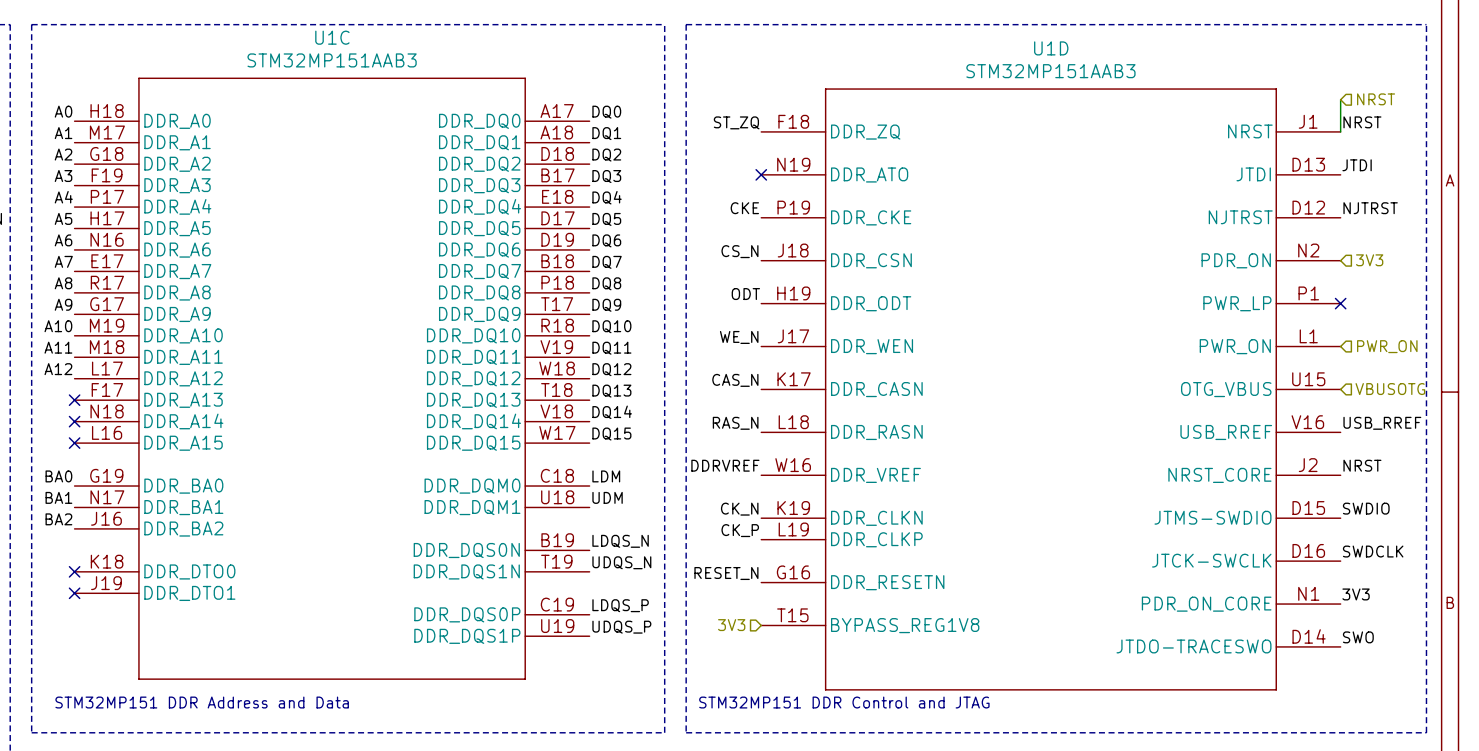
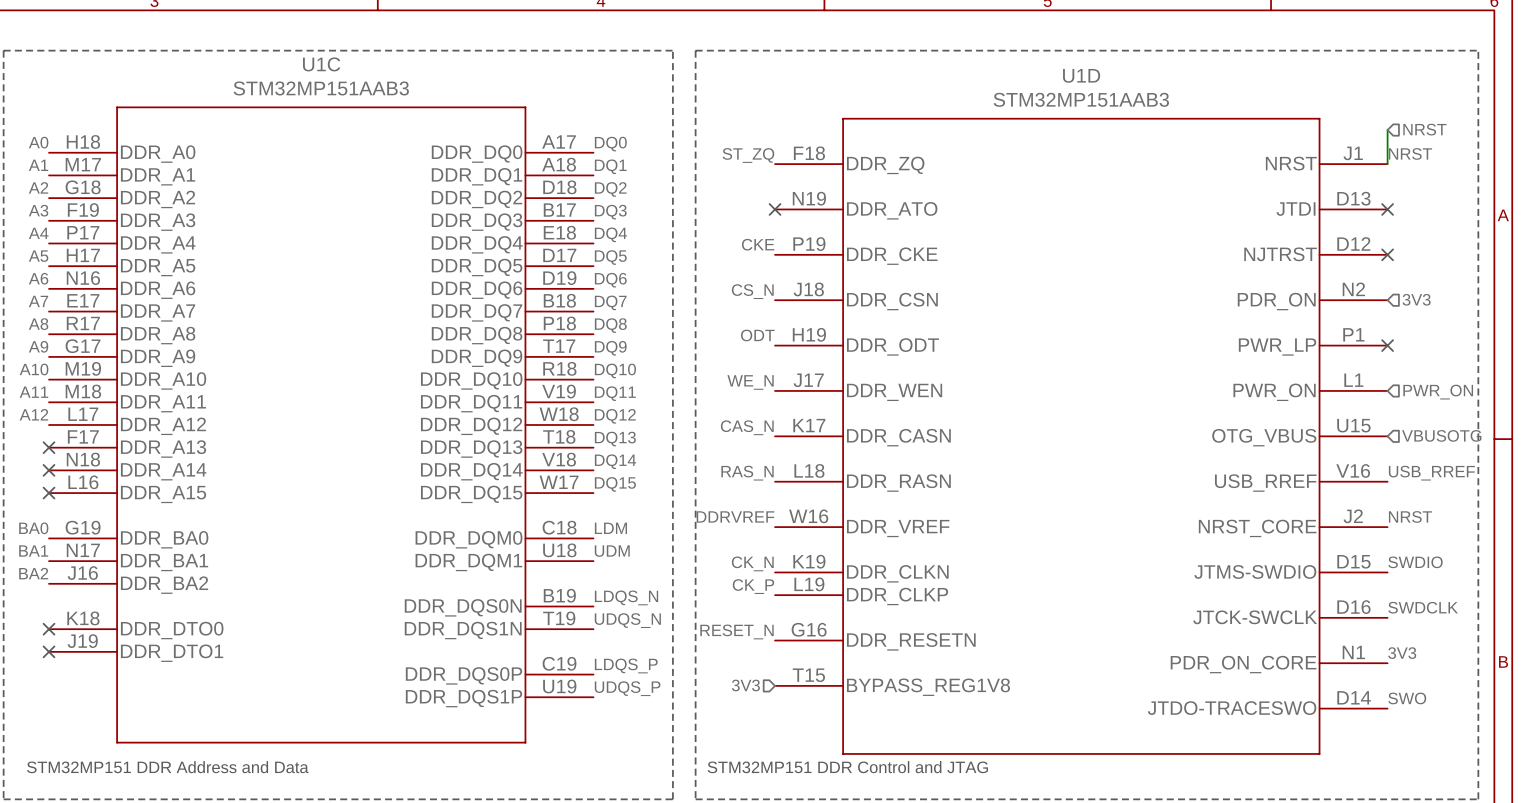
label: JTDI (1357, 165) -> none
no-connect mark: none -> (1387, 209)
label: NJTRST (1370, 208) -> none
no-connect mark: none -> (1387, 254)

